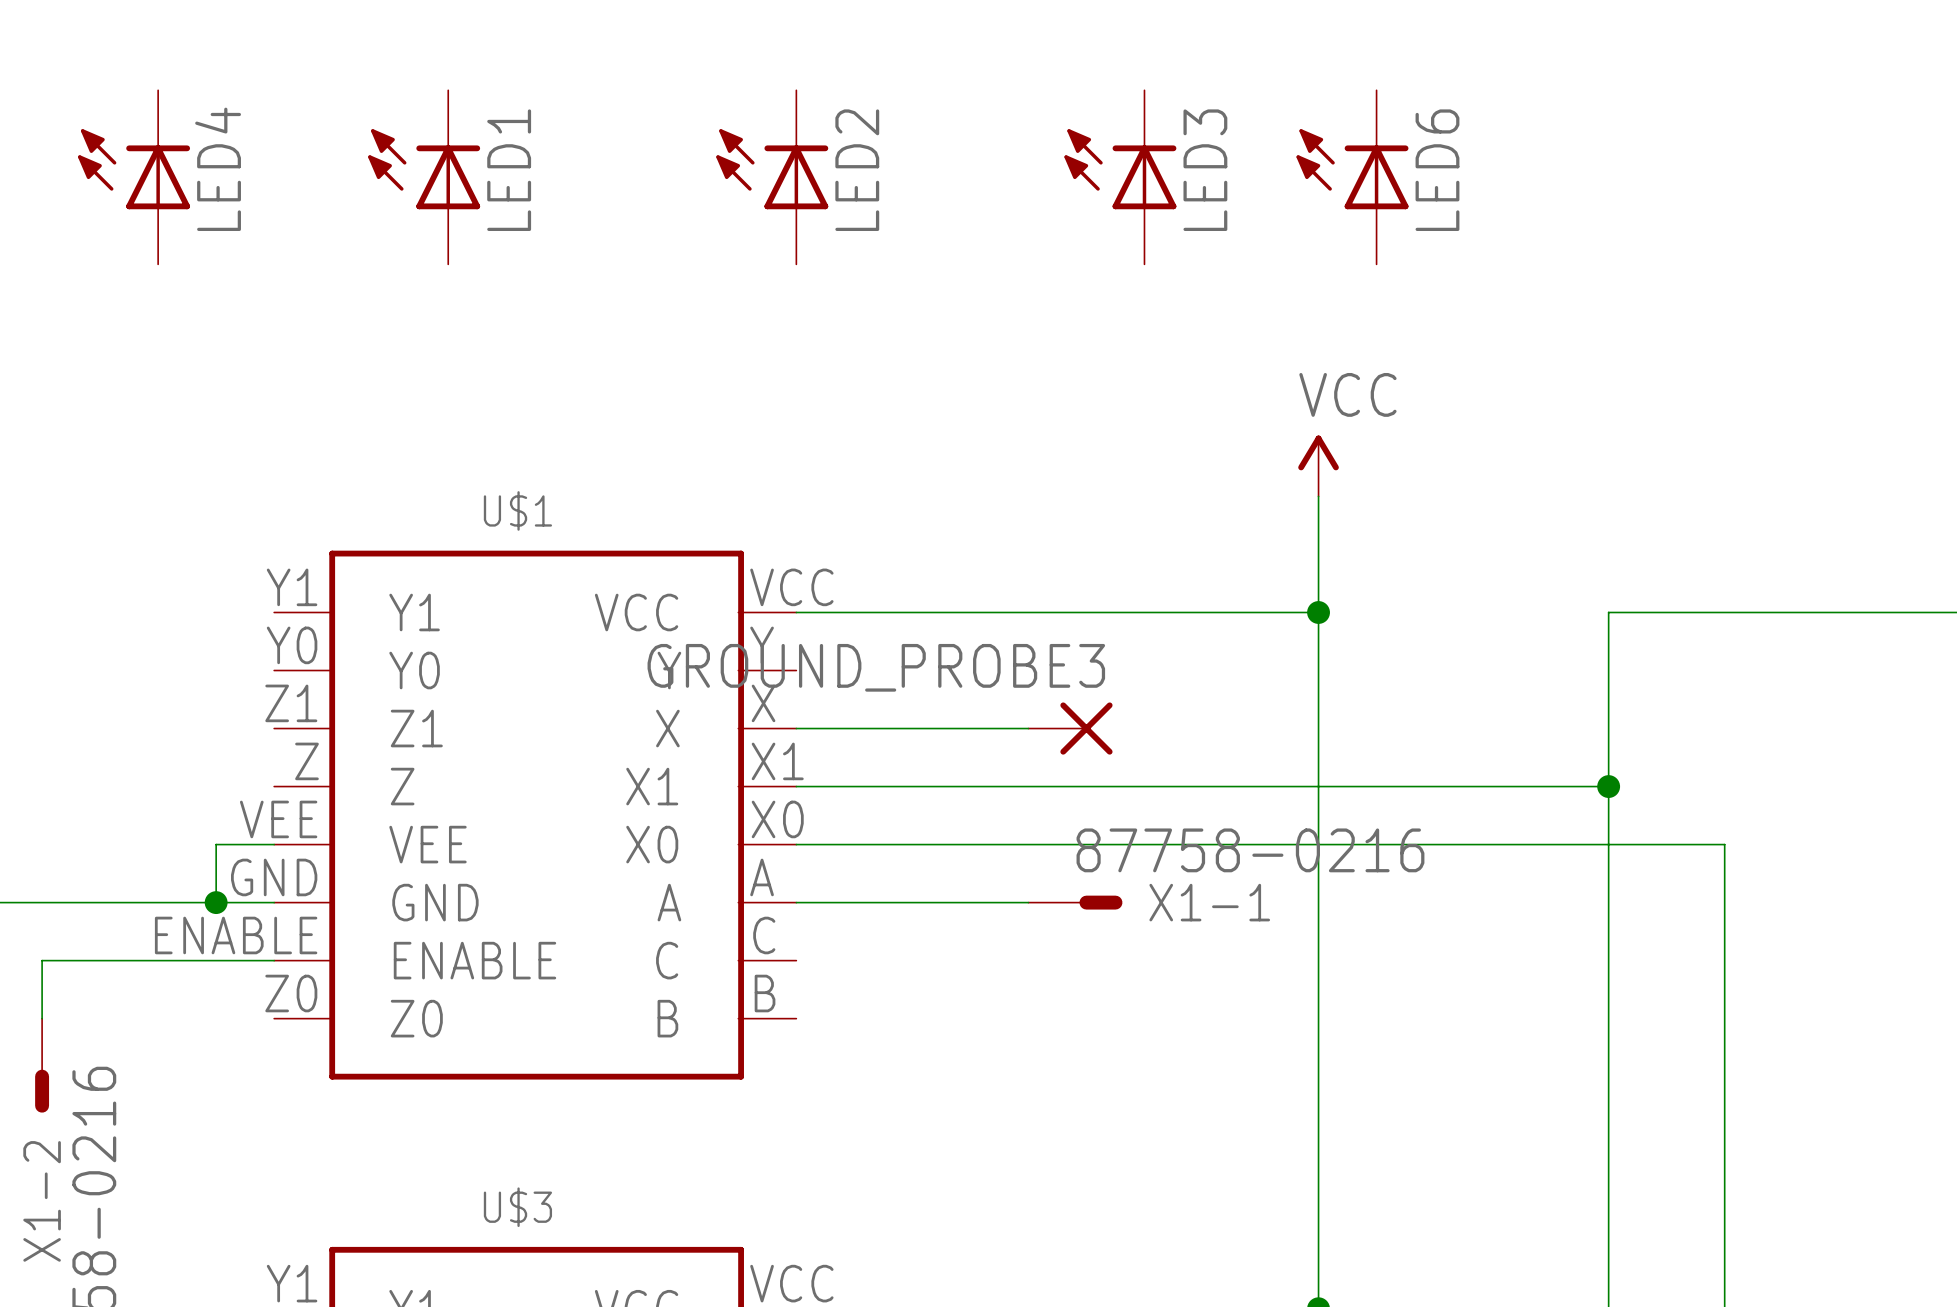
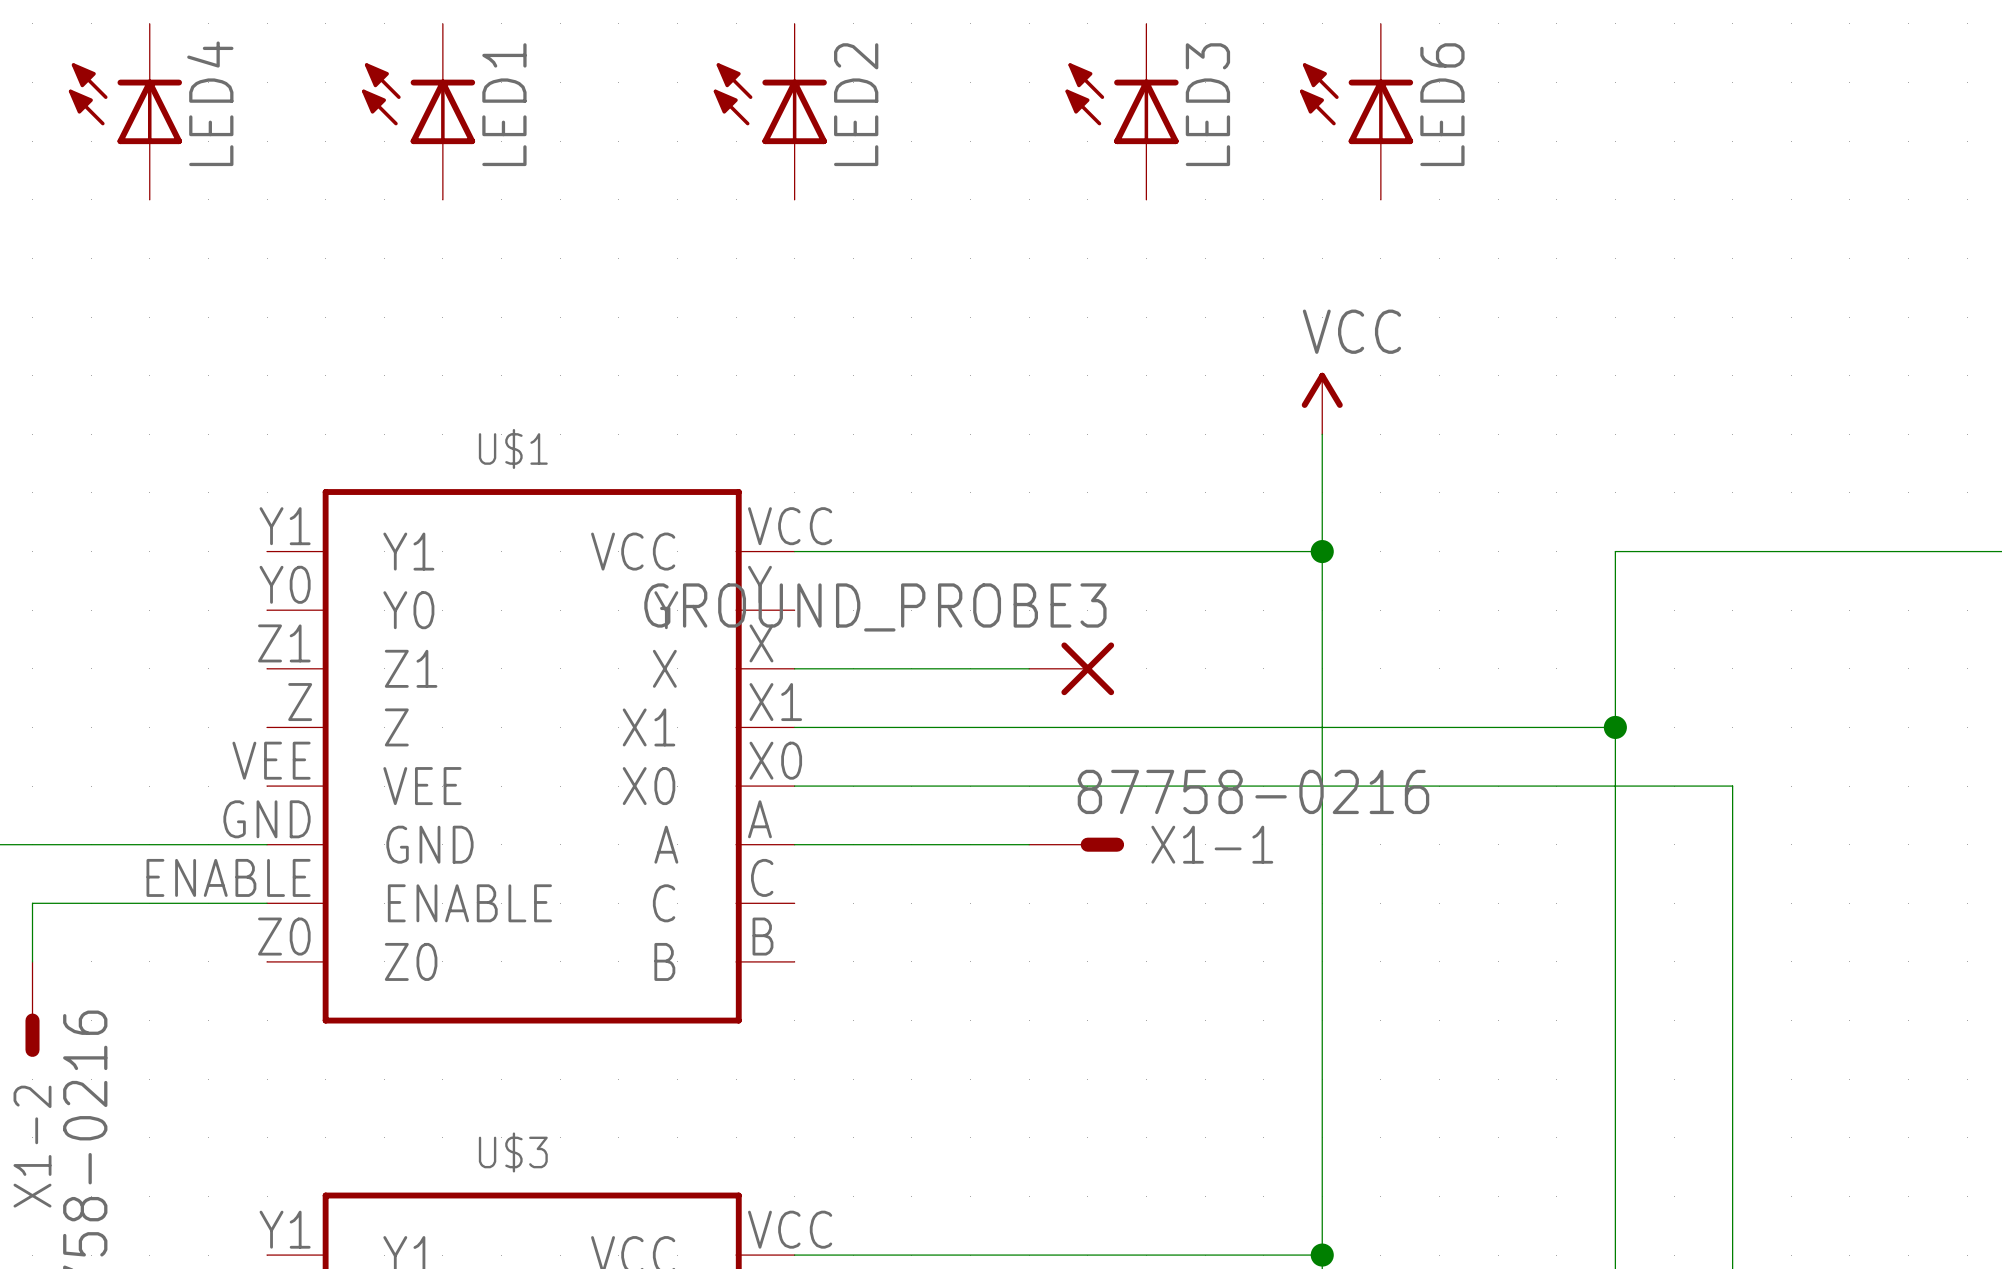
wire: (274, 844) (216, 844) (216, 902) -> none
junction: (216, 902) -> none

